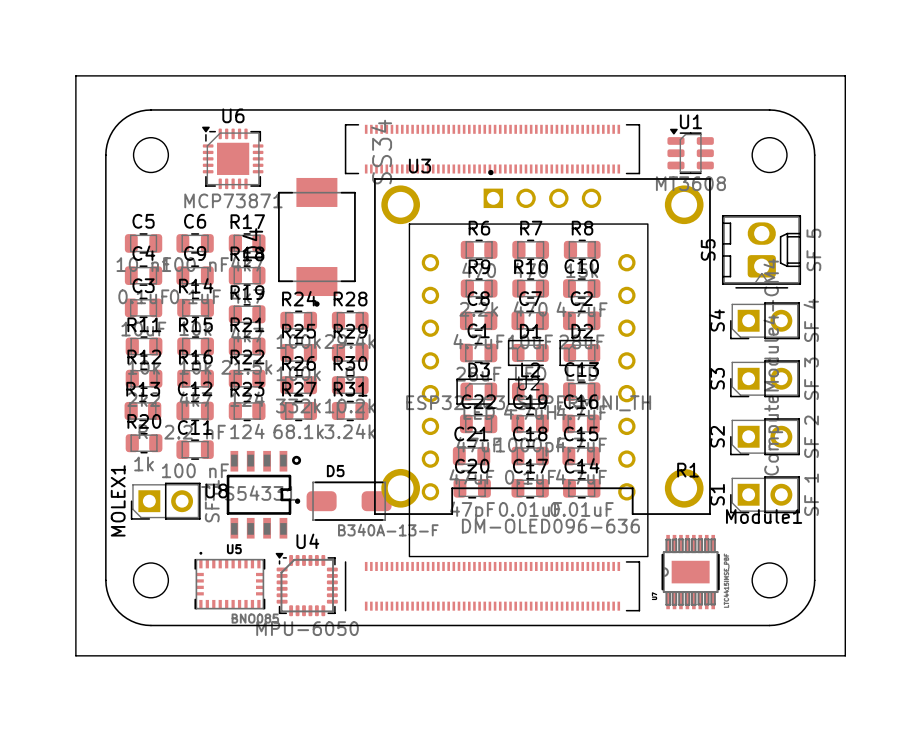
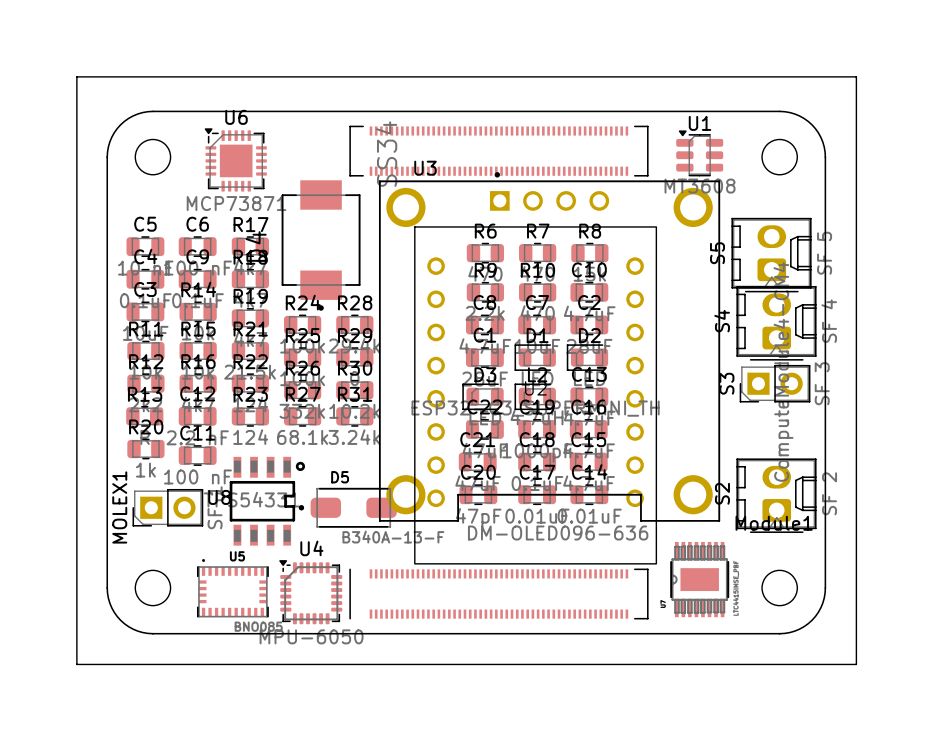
S4 footprint: [730, 302, 800, 340] -> [736, 286, 817, 361]
S2 footprint: [730, 418, 800, 456] -> [736, 458, 817, 533]
R1: (687, 470) -> none
S1: SF 1 (765, 494) -> none

